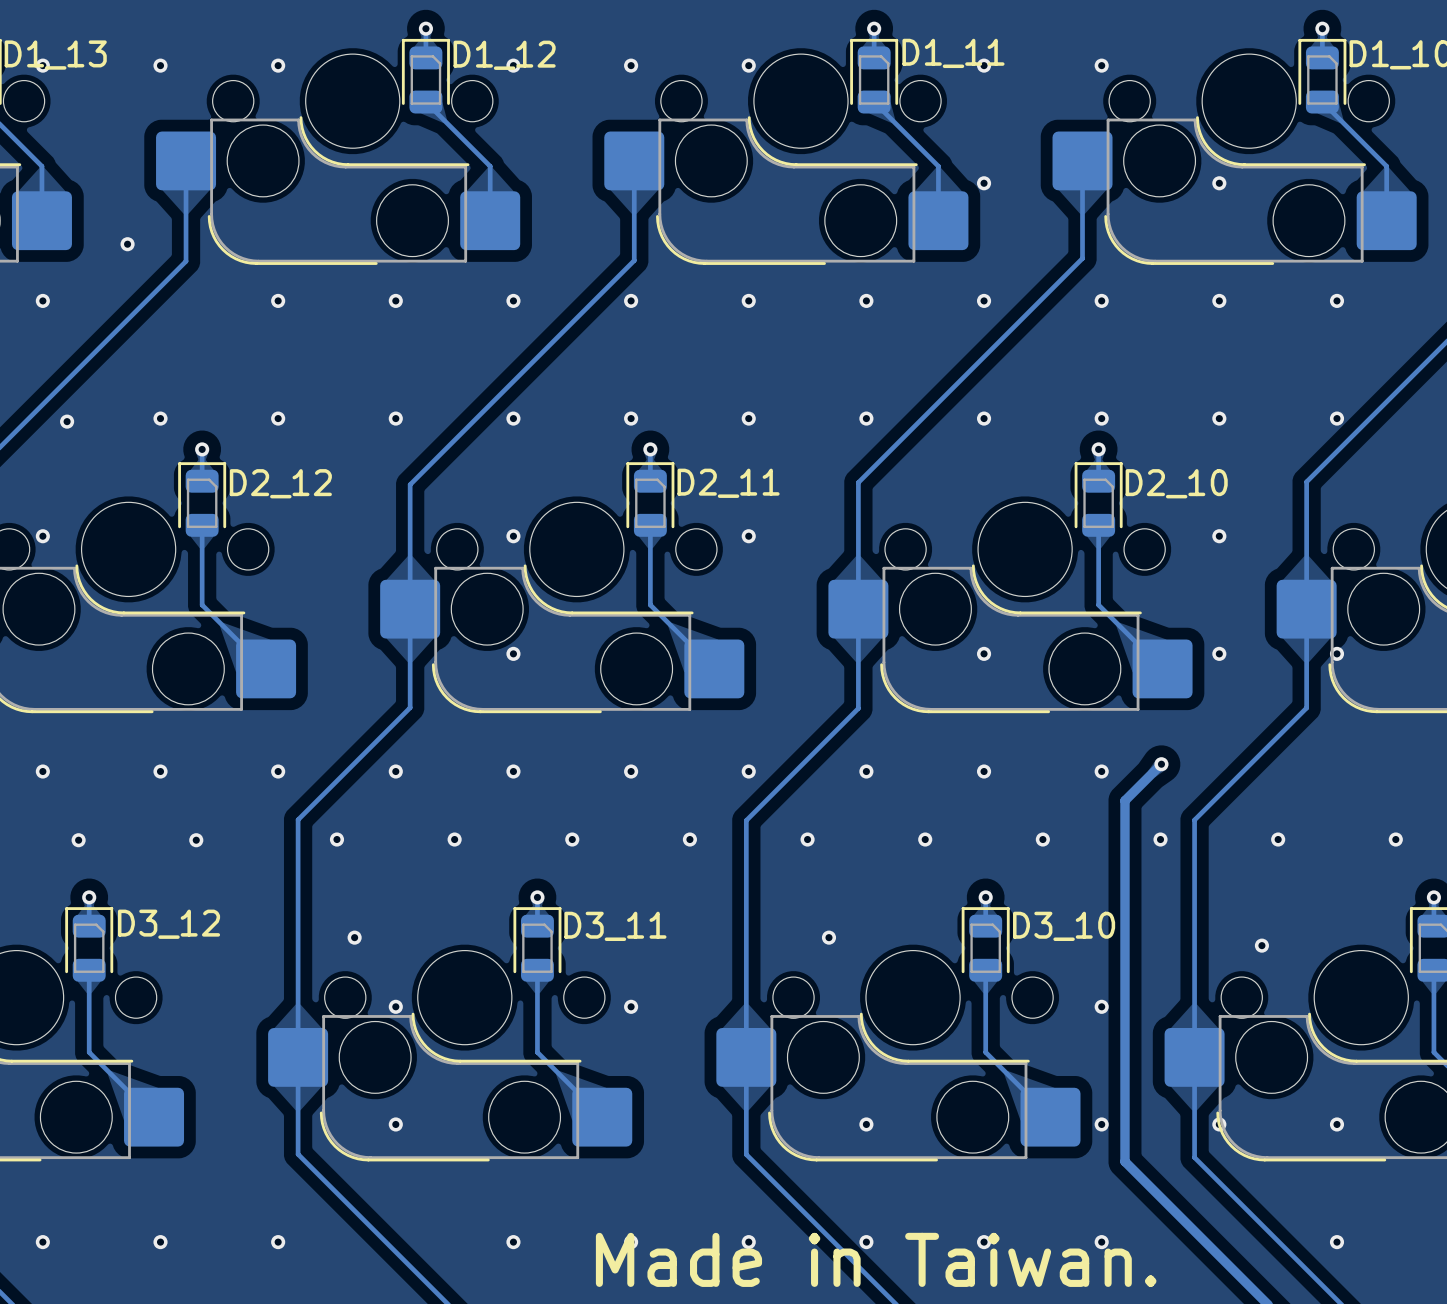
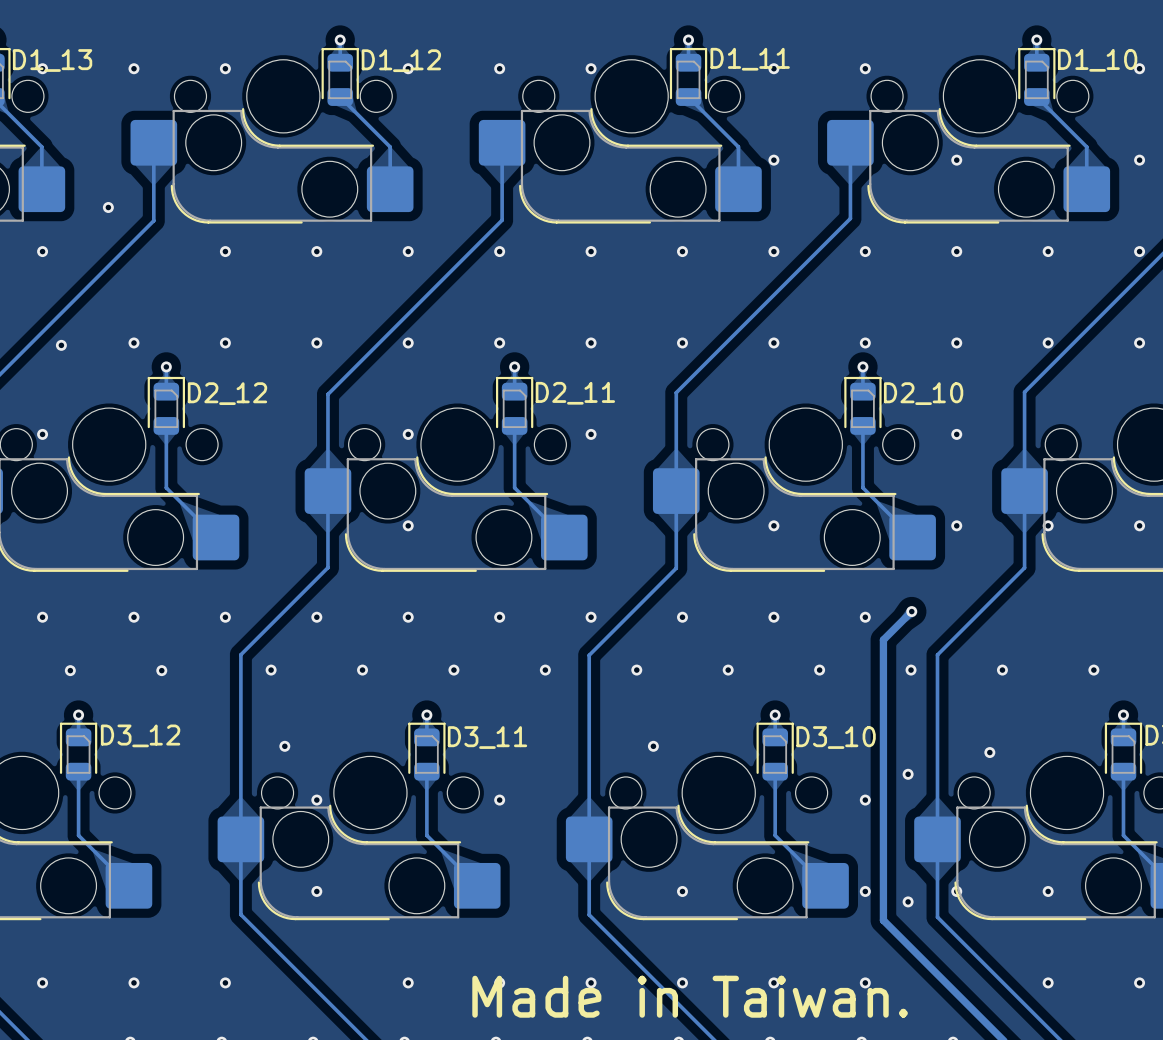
via: none -> (908, 774)
via: none -> (908, 901)

